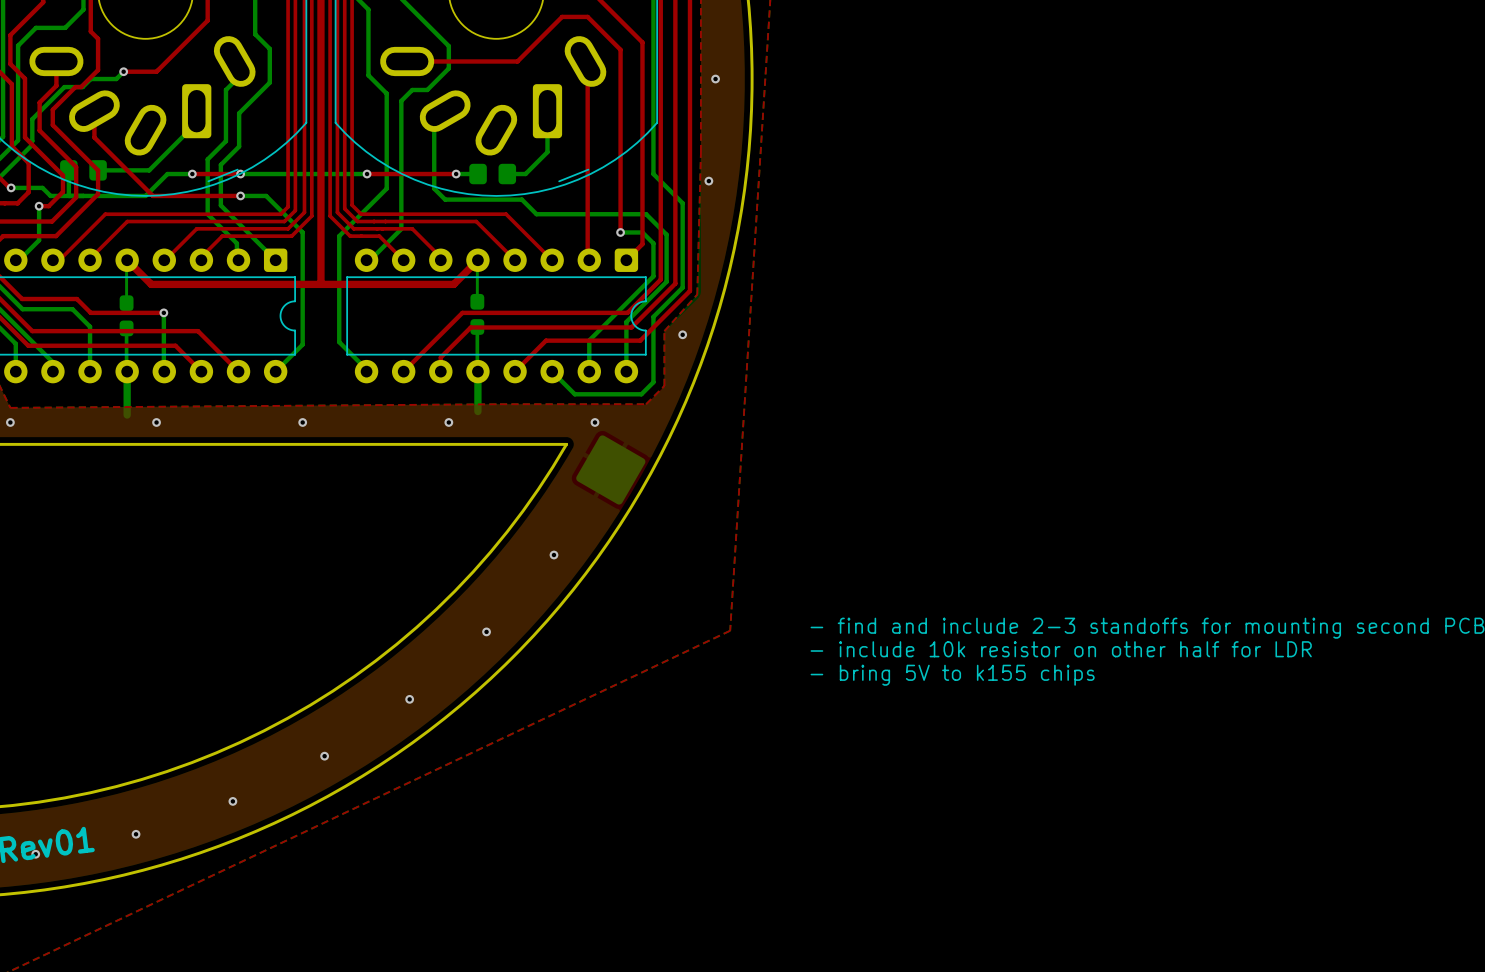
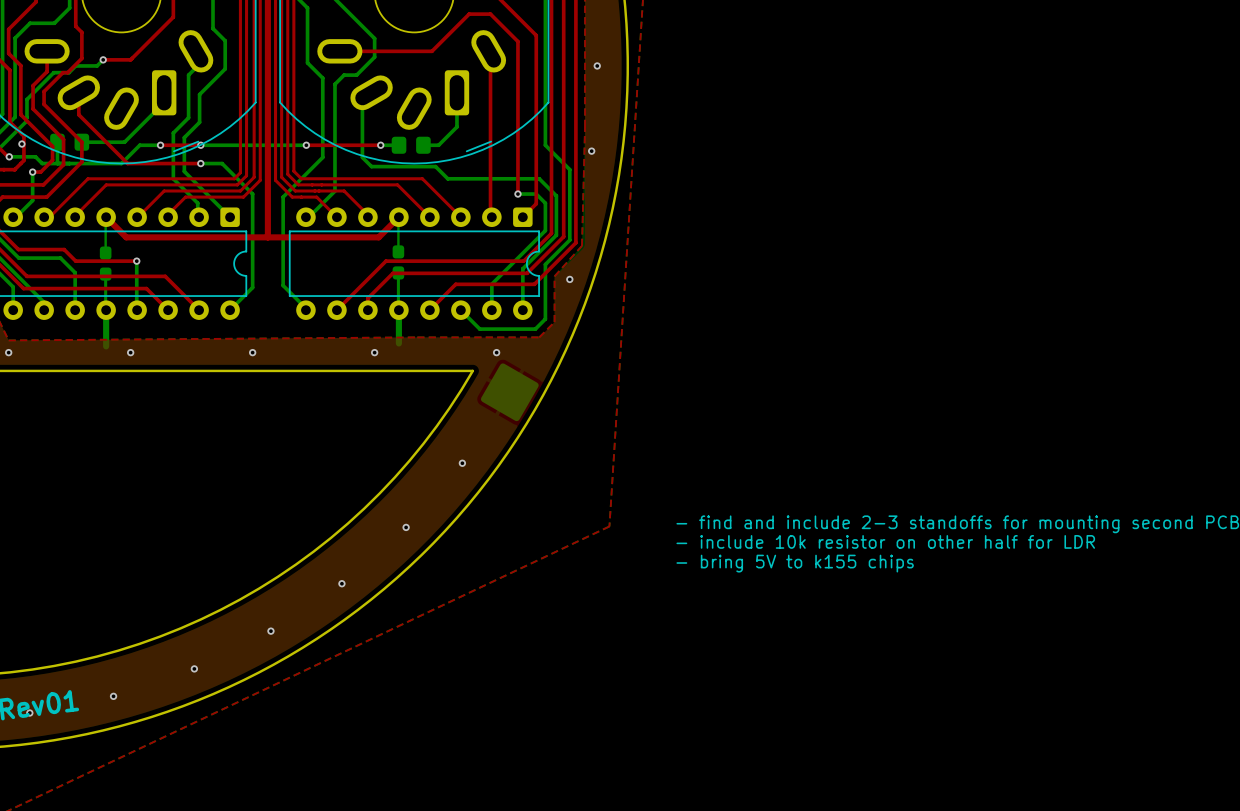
via: none -> (21, 144)

